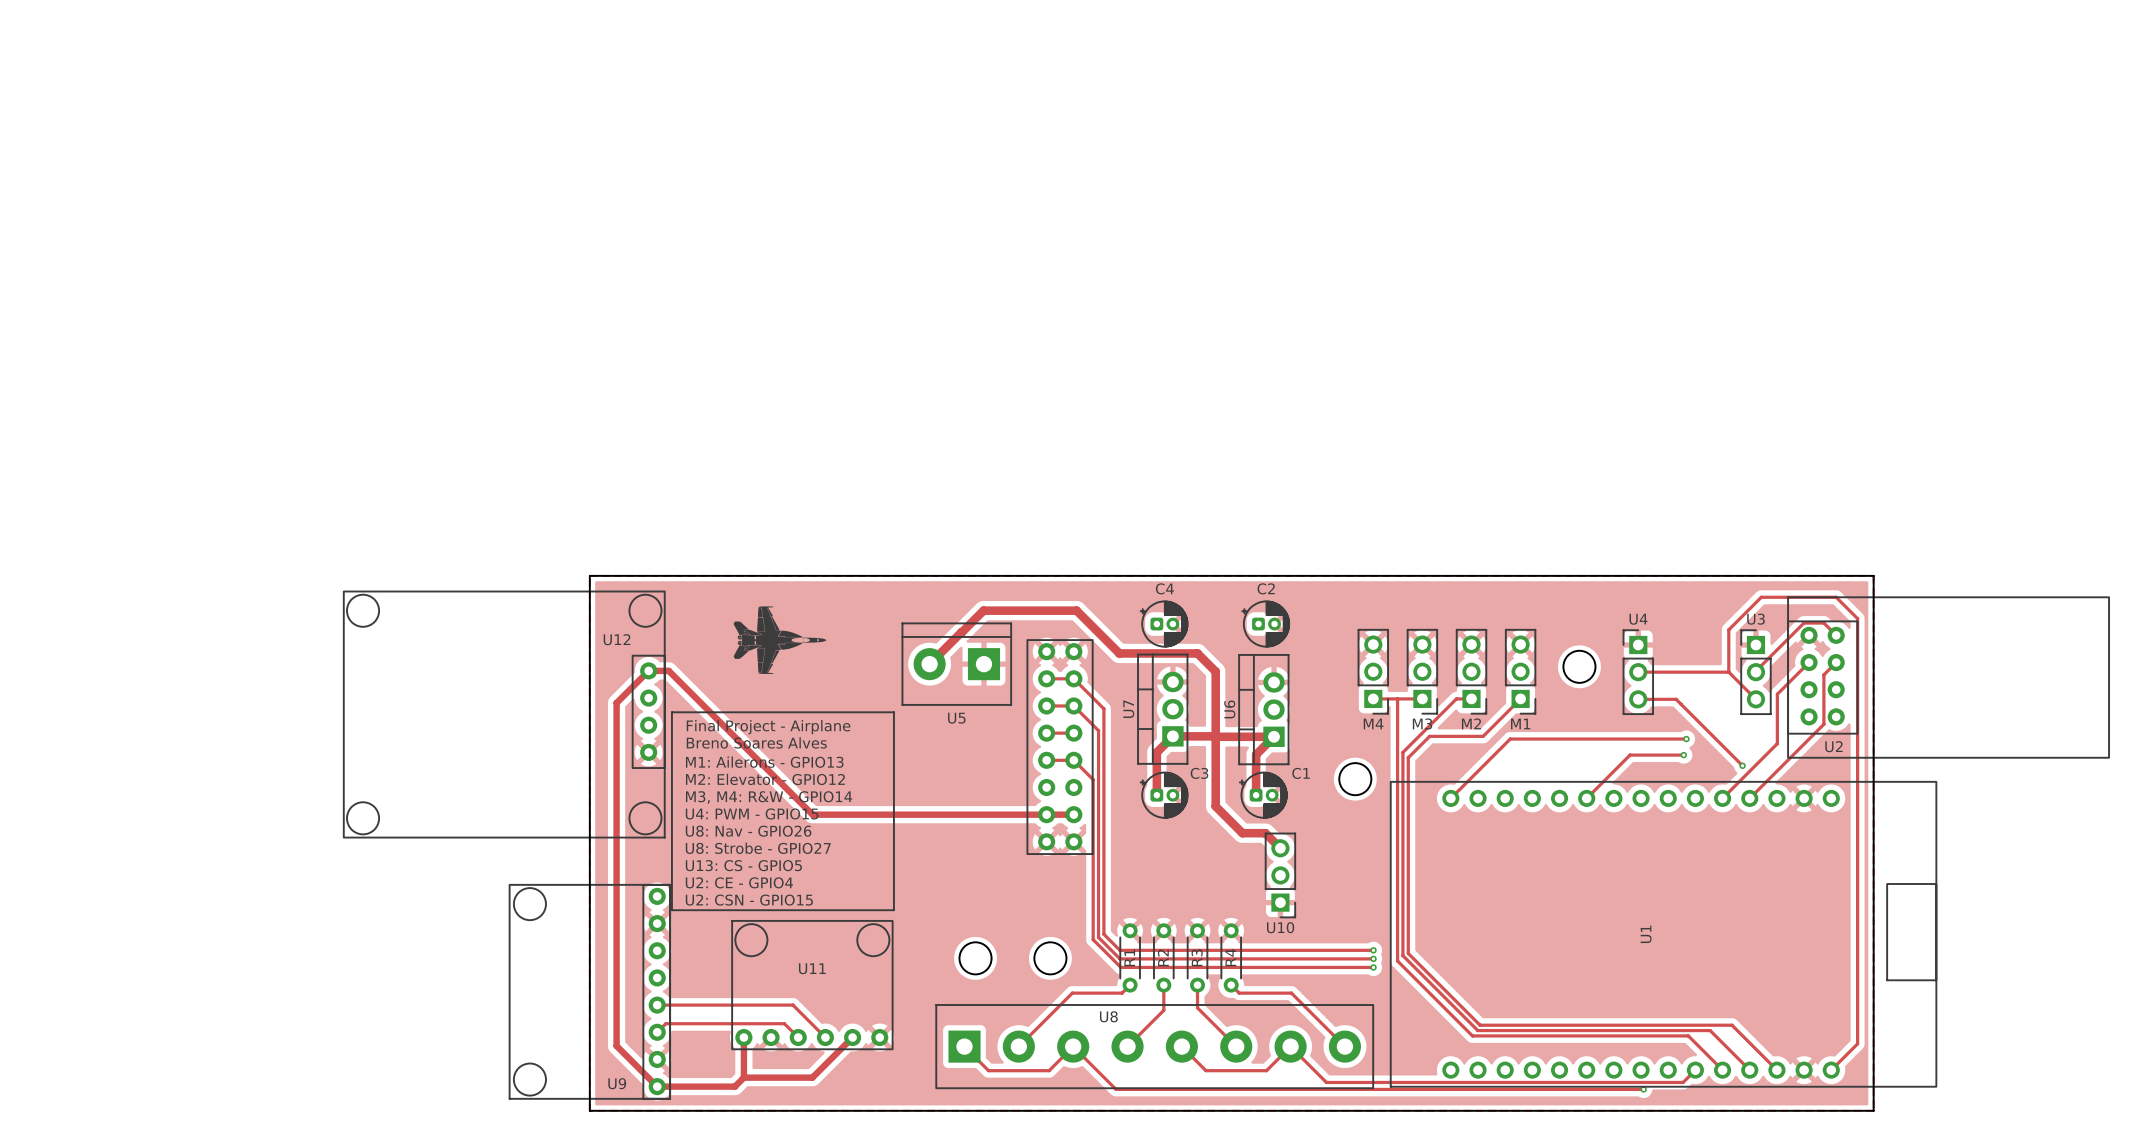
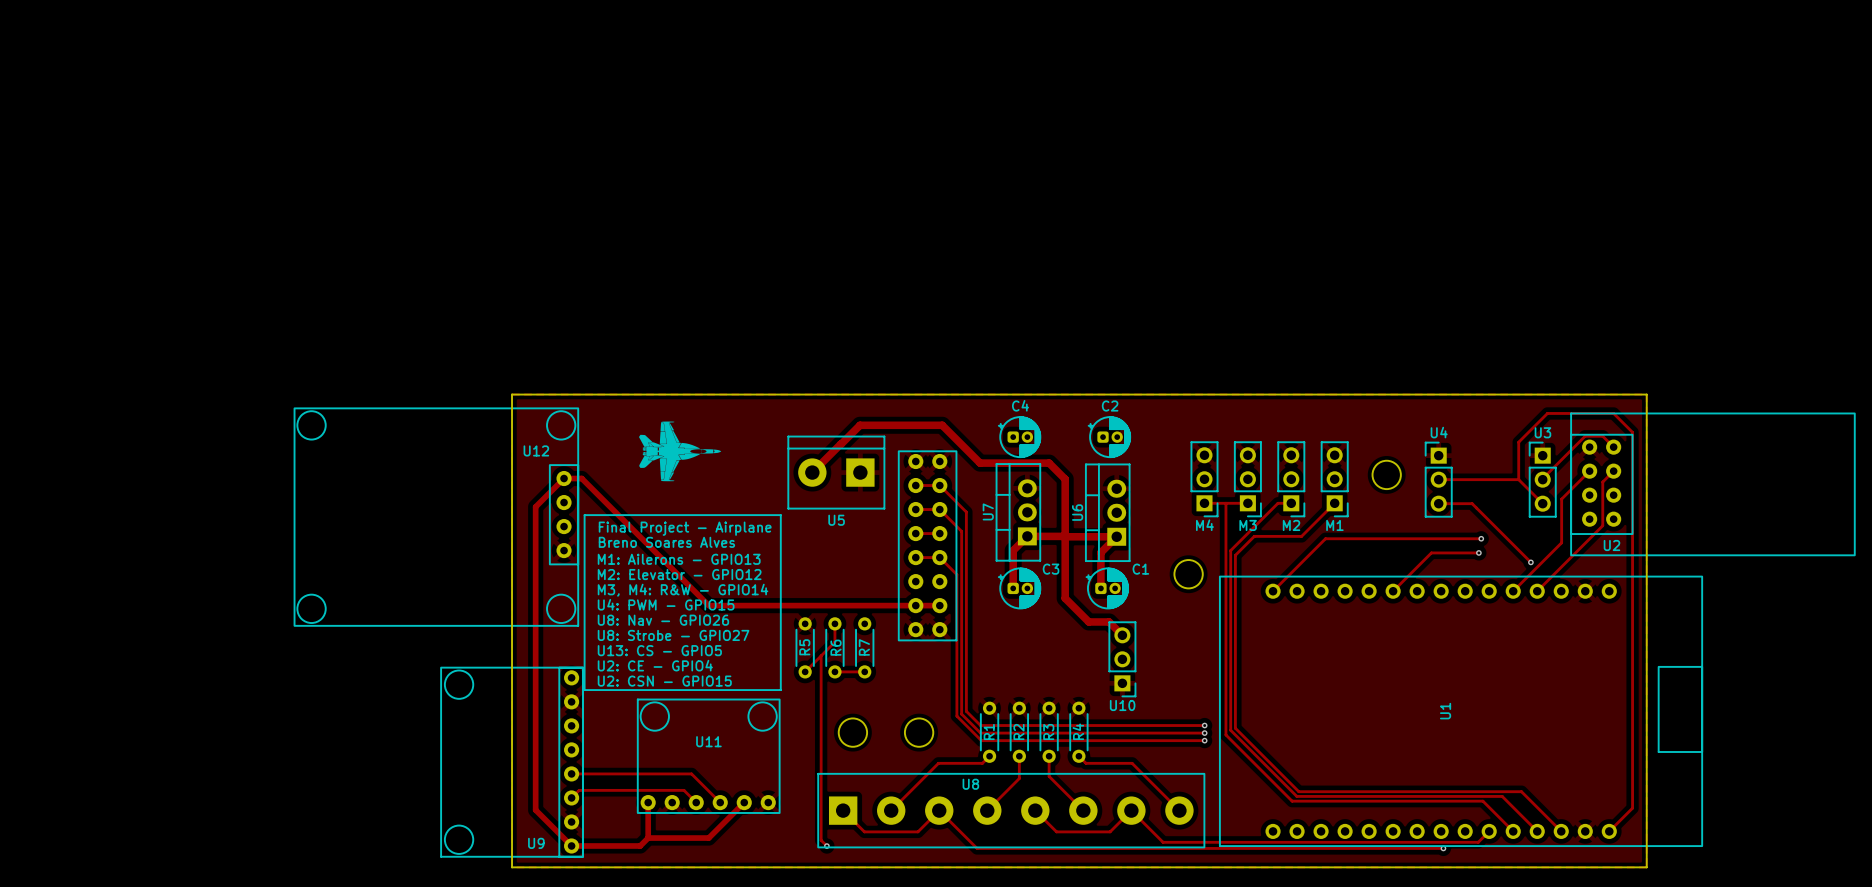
track: none -> (834, 623) (834, 642) (805, 671)
R5: none -> (805, 647)
R6: none -> (834, 647)
R7: none -> (864, 647)
track: none -> (821, 655) (821, 840) (826, 846)
track: none -> (834, 671) (864, 671)
via: none -> (826, 846)

